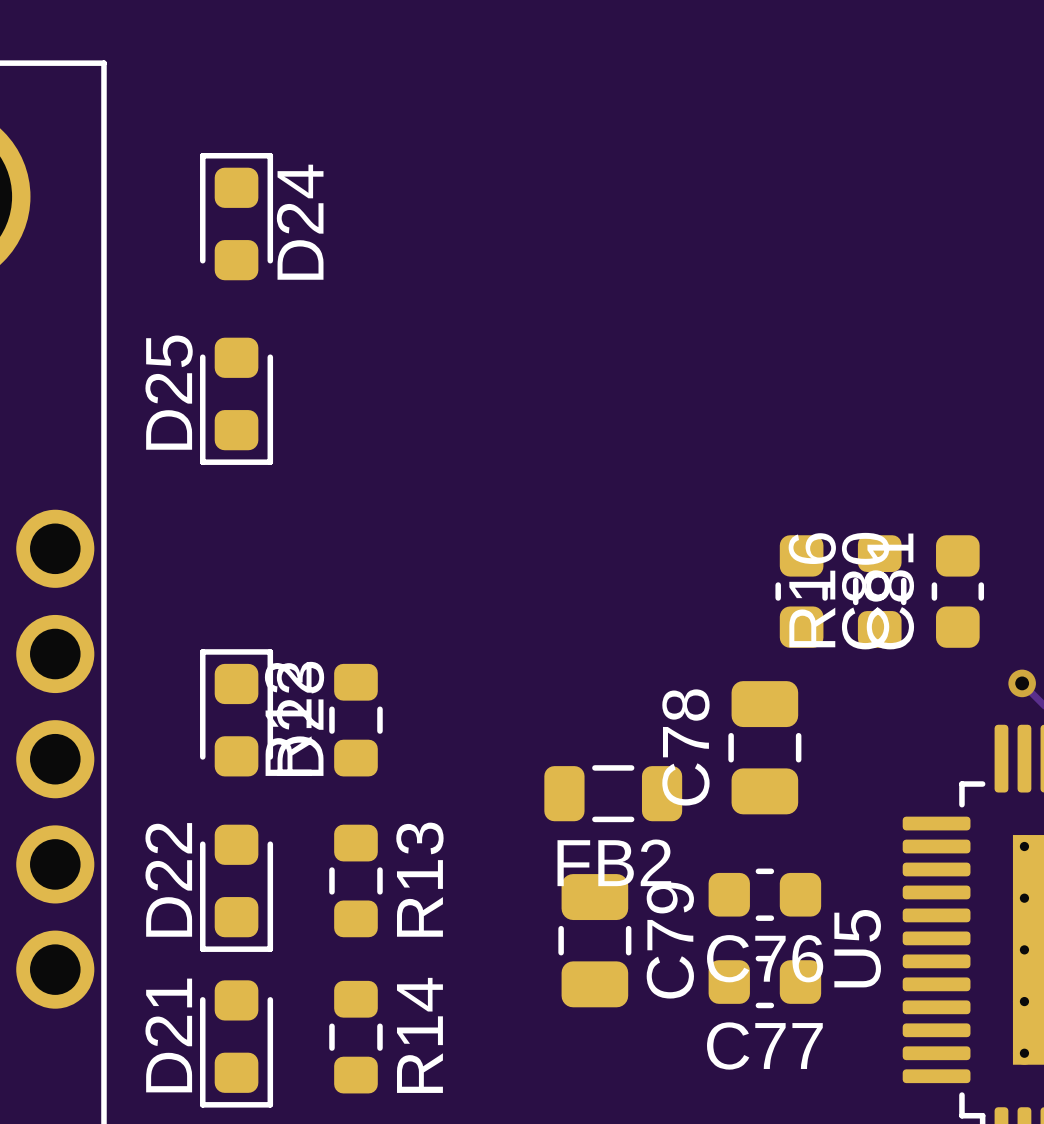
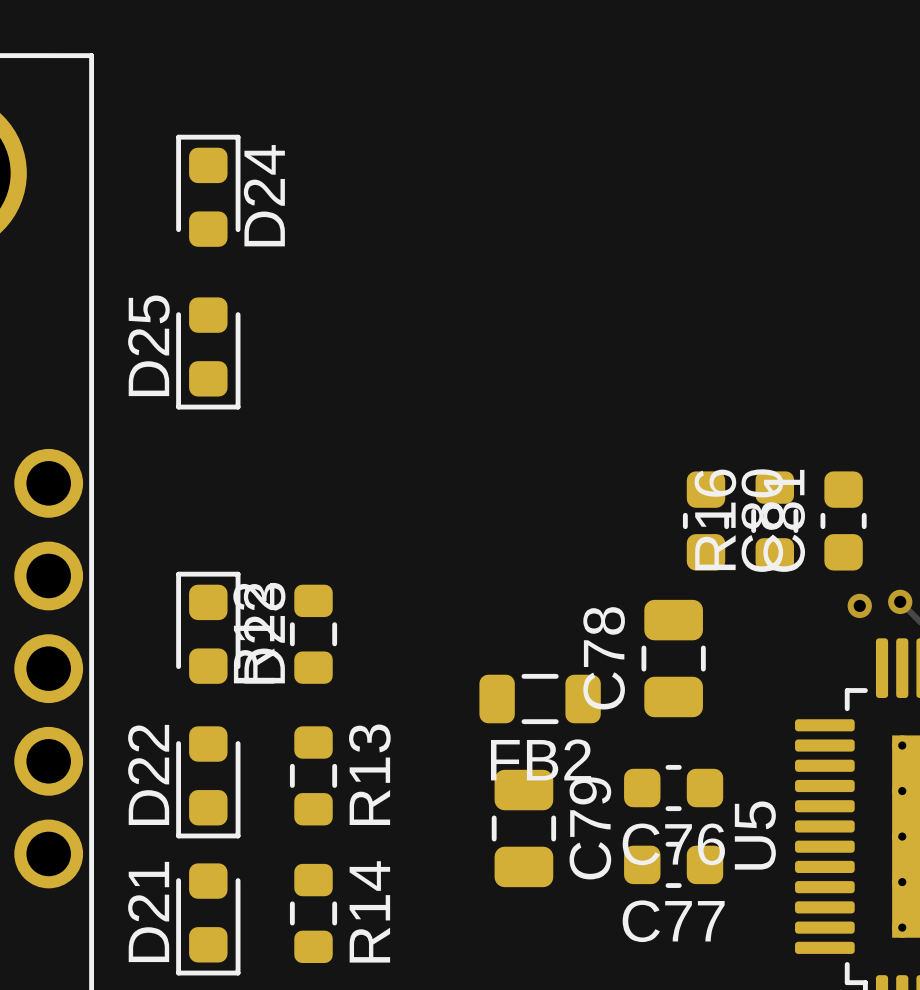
via: none -> (859, 605)

